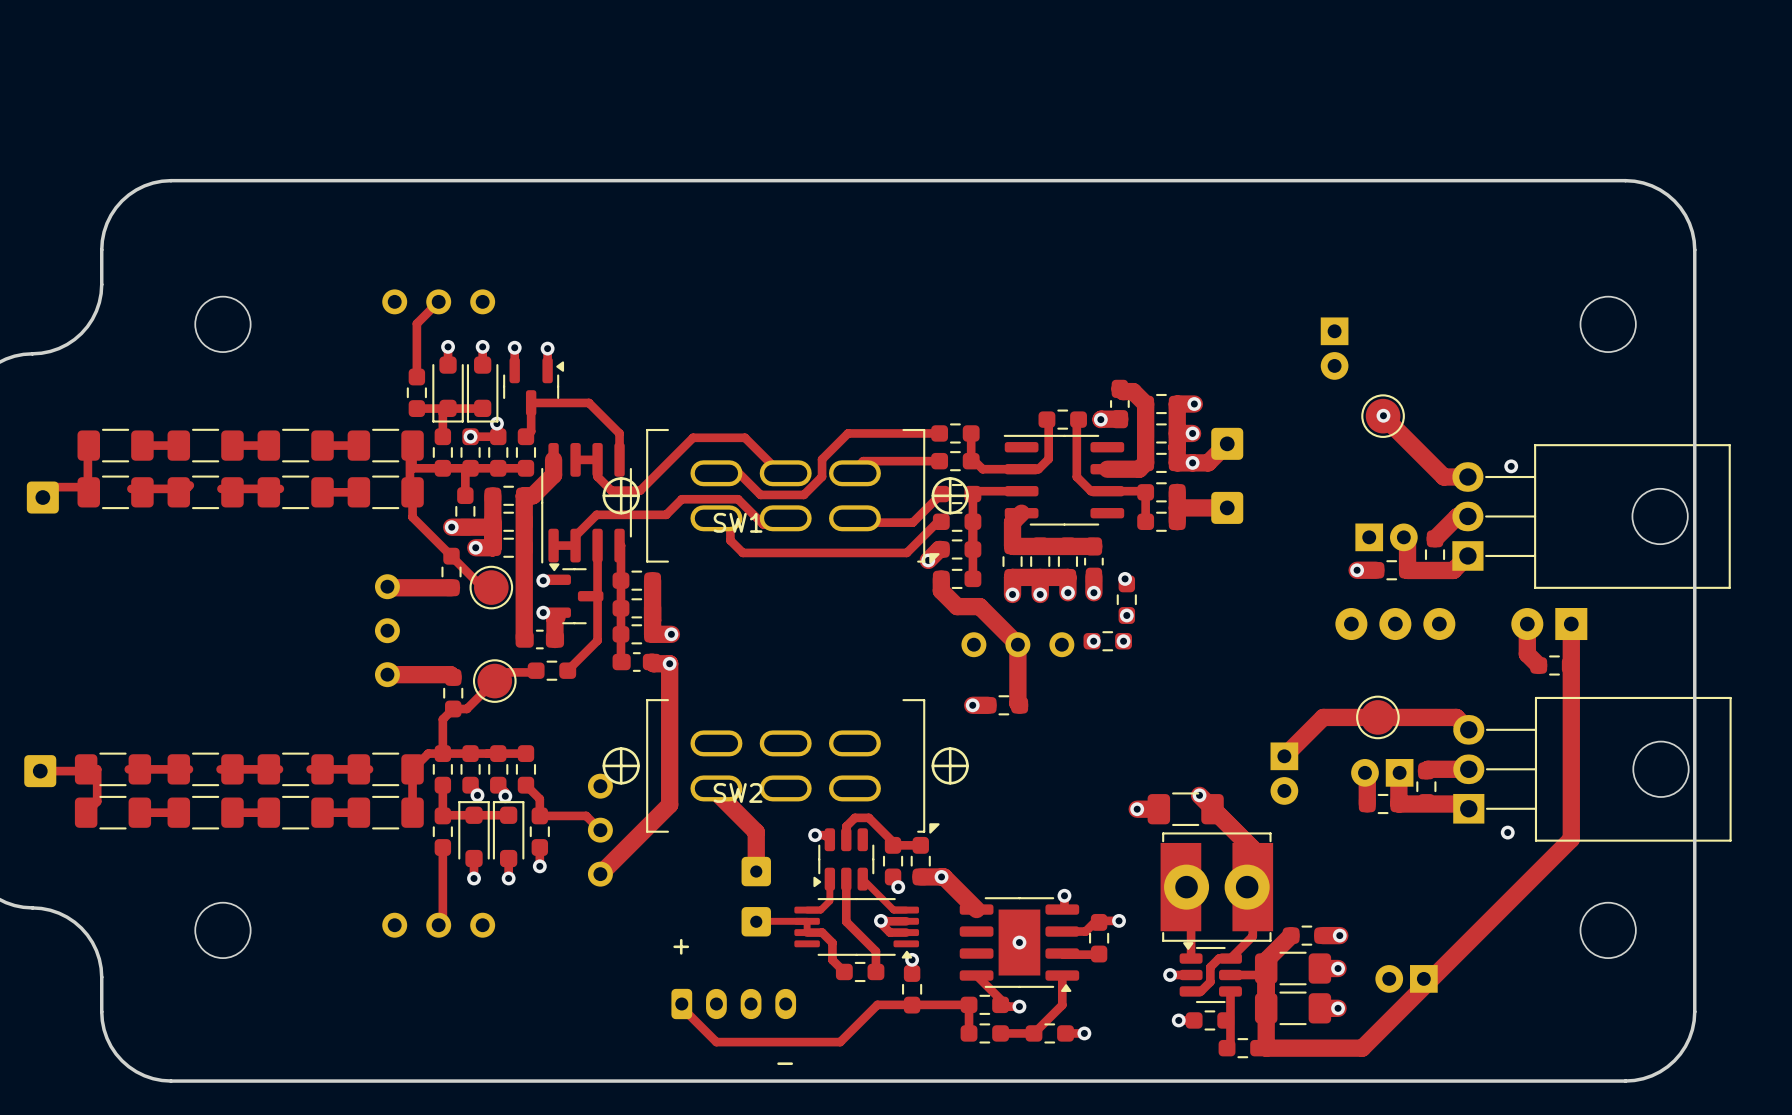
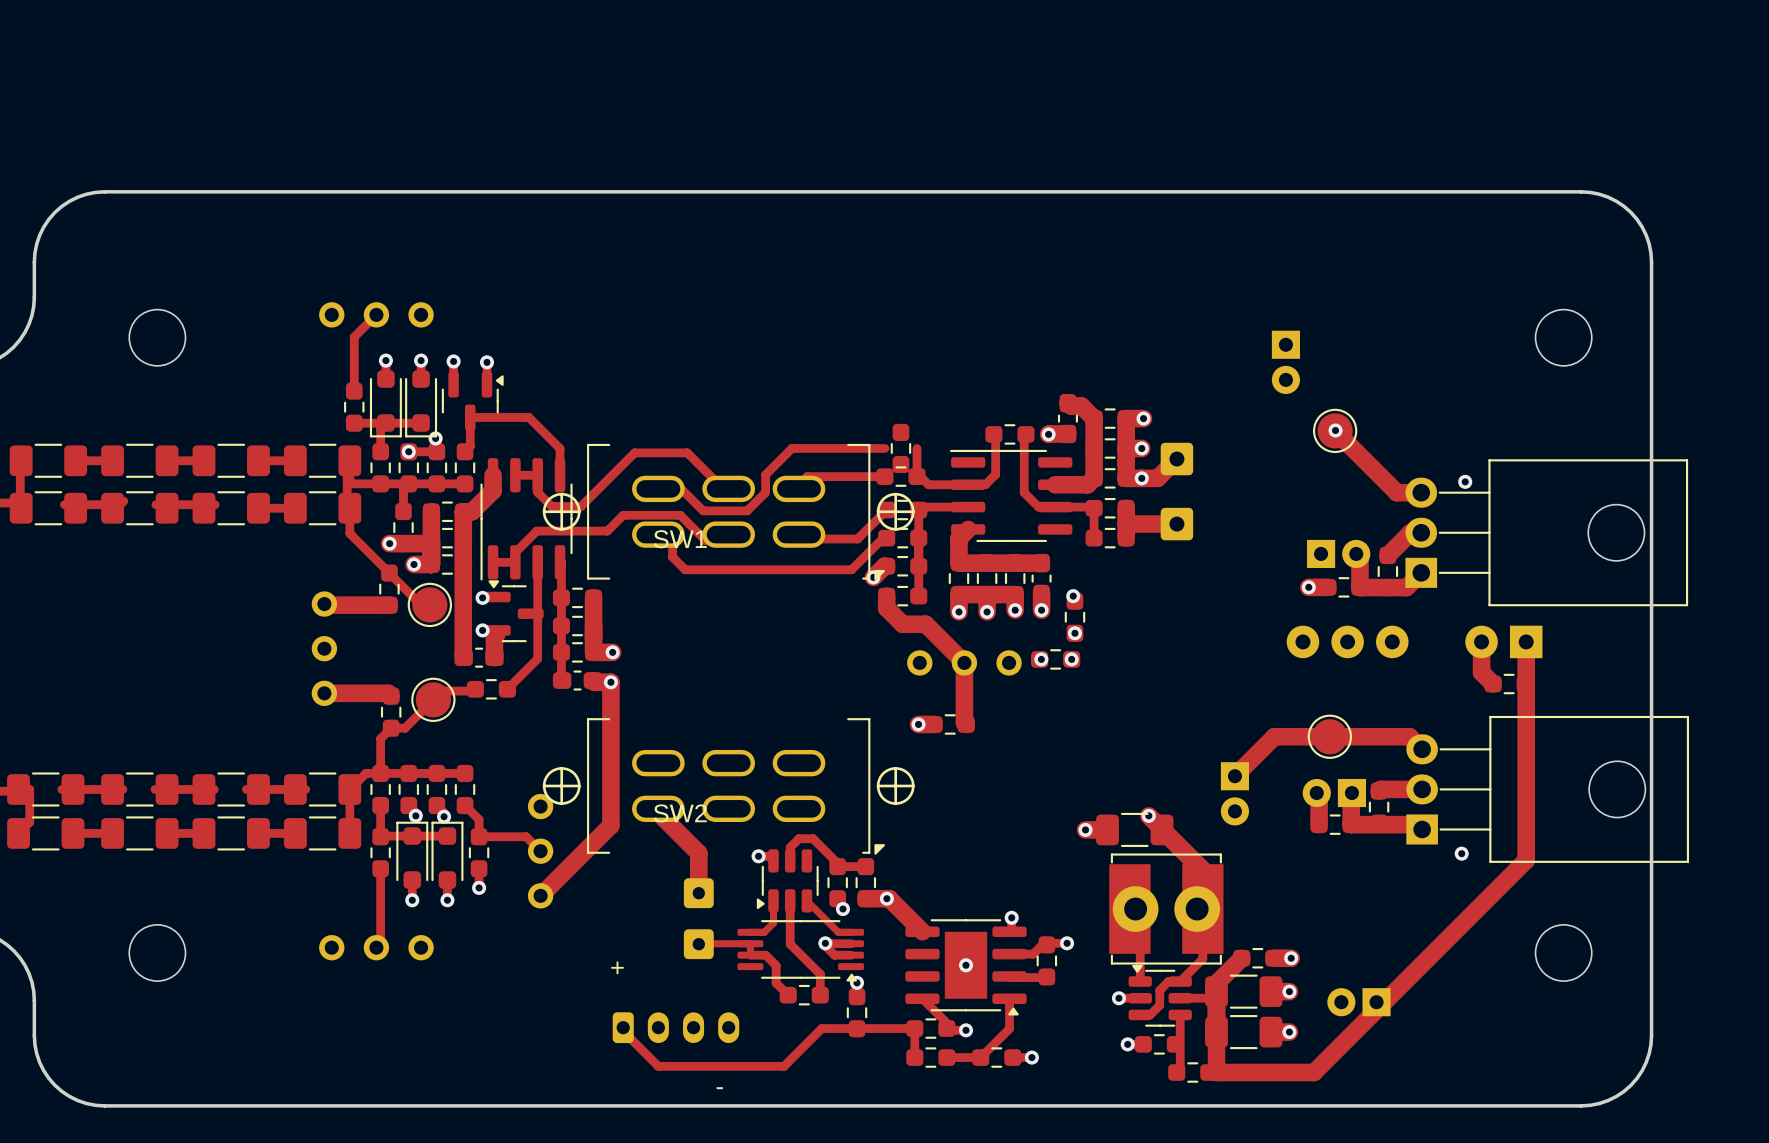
part rotation: 0° (955, 433) -> 90° clockwise (900, 448)

